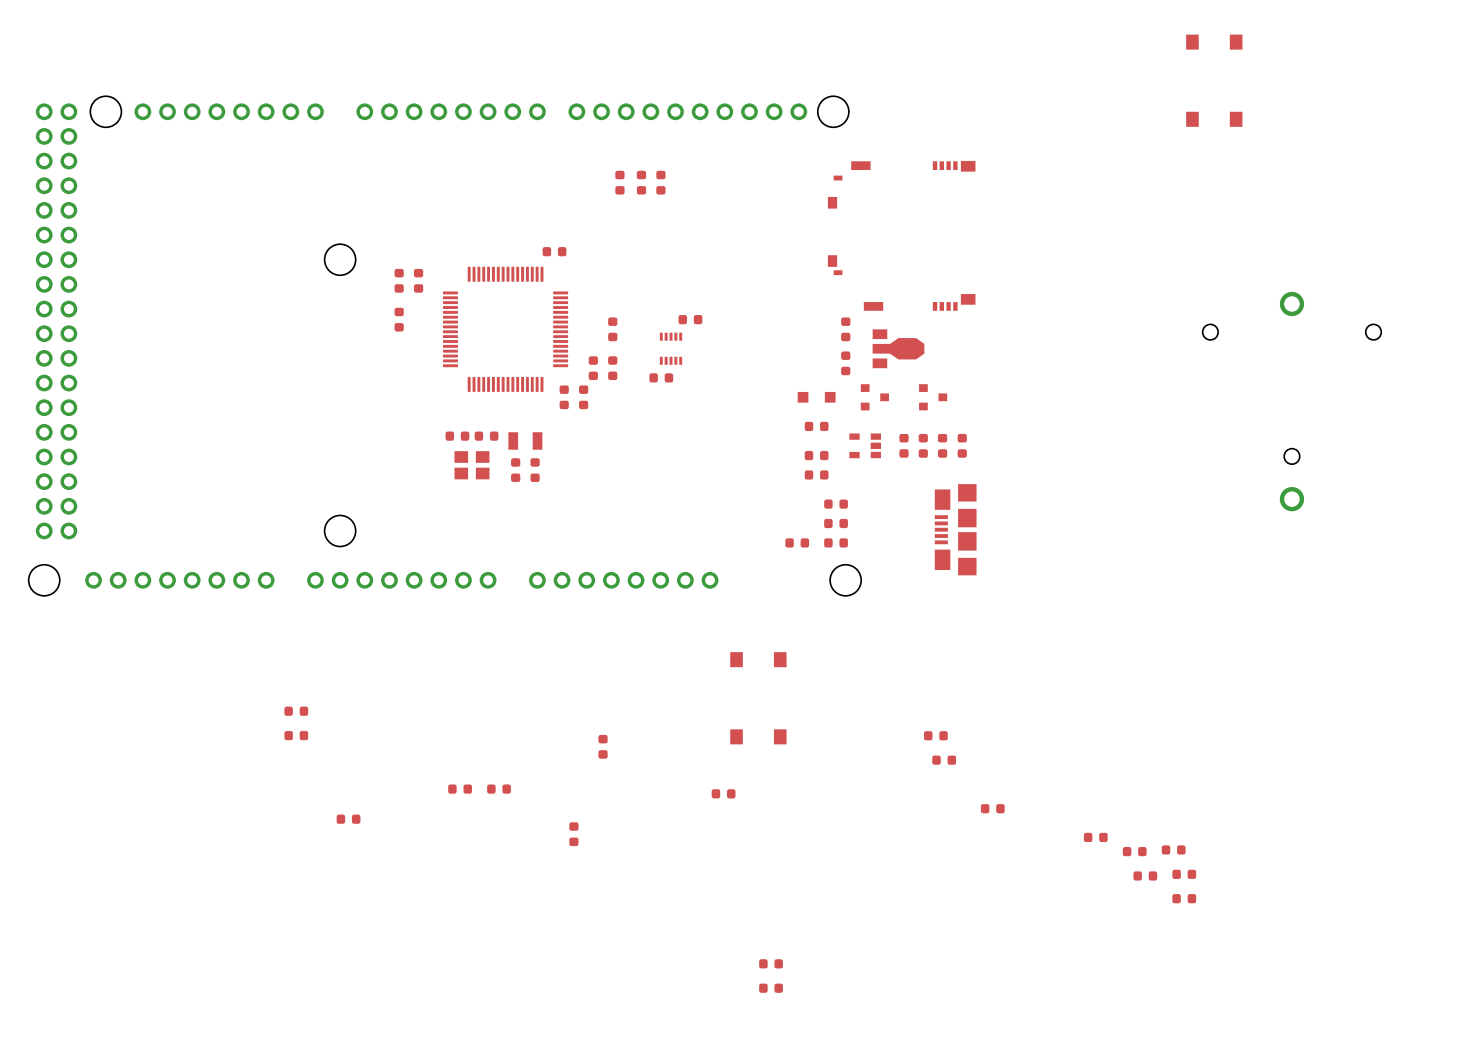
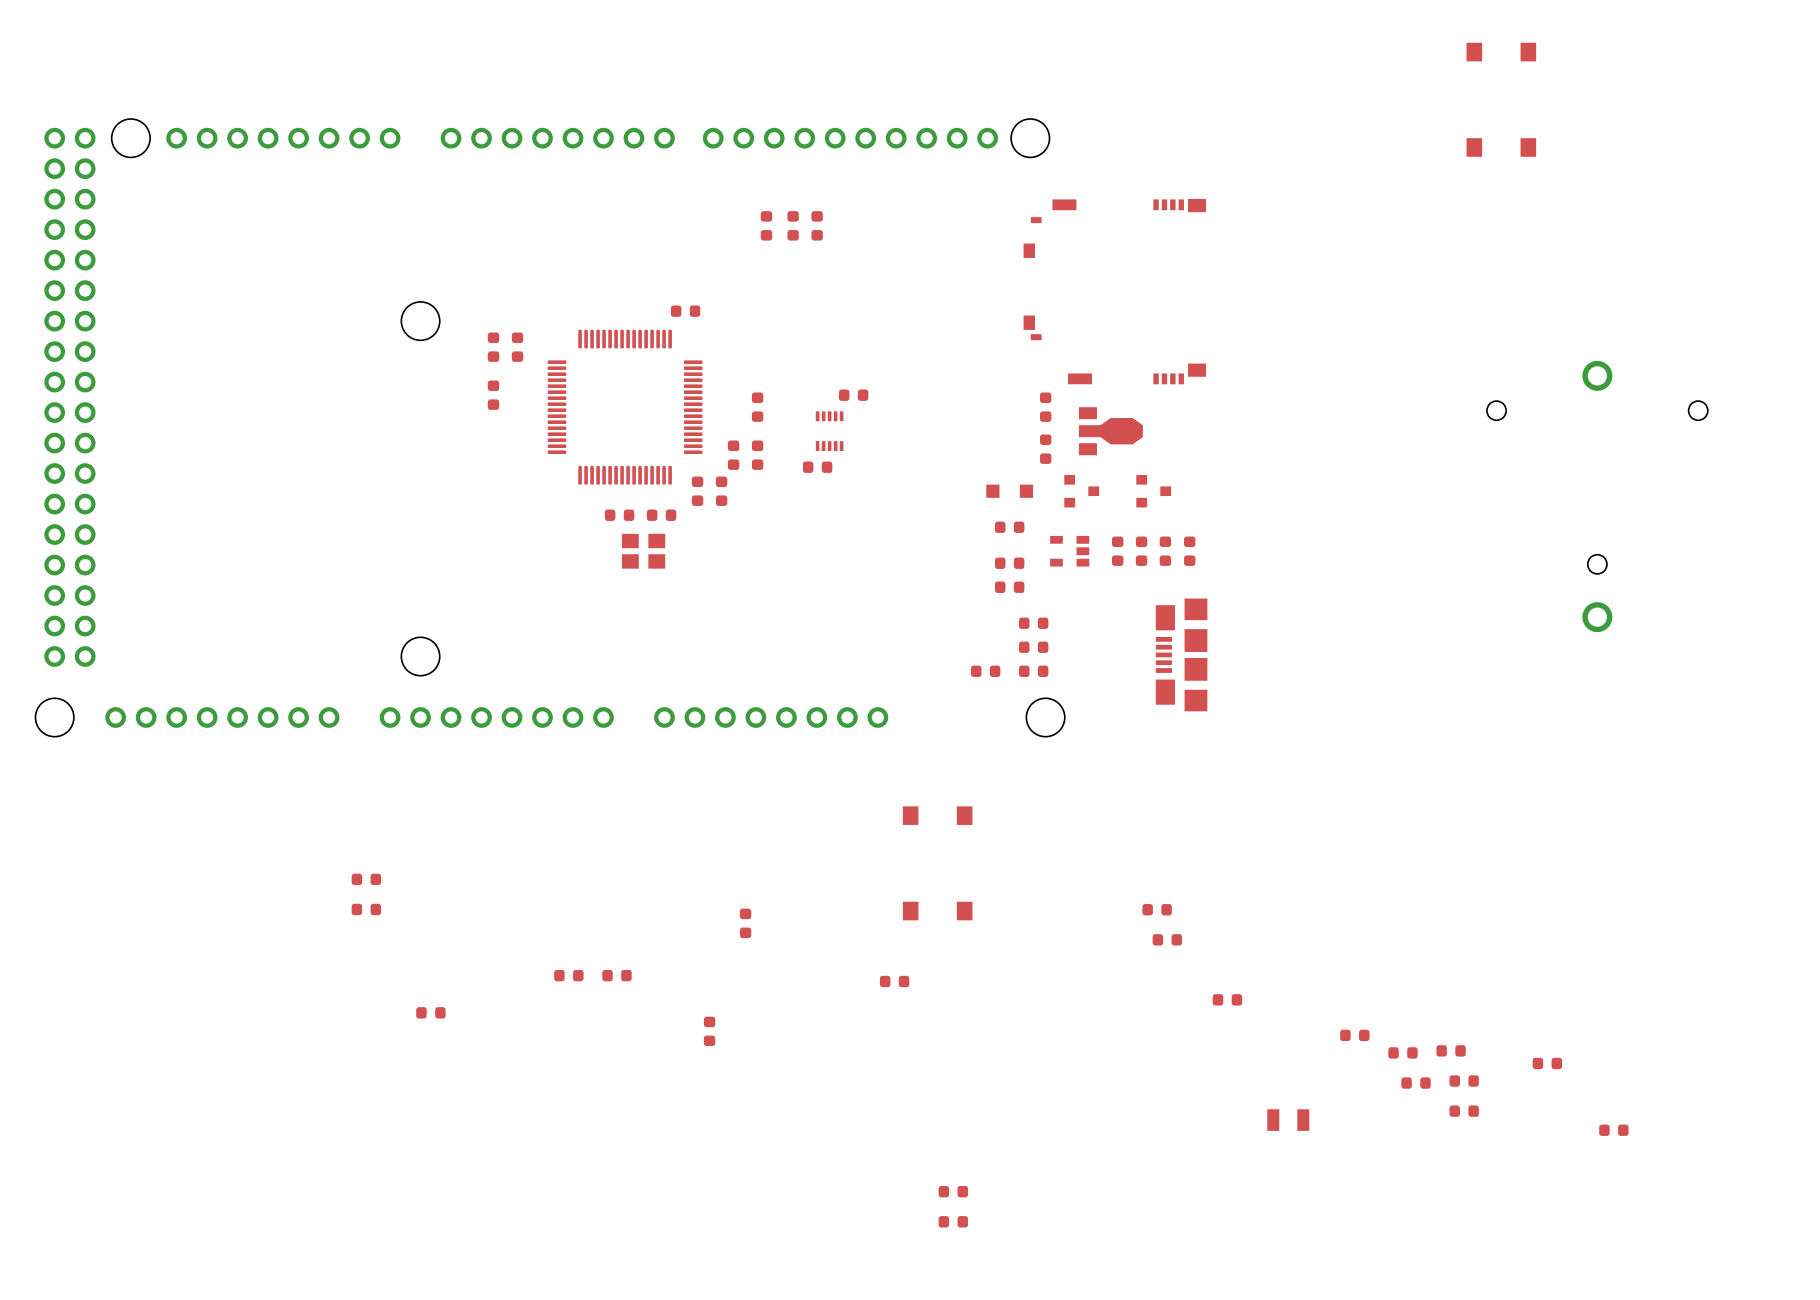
part: none -> (619, 515)
part: none -> (661, 515)
part footprint: [508, 432, 543, 450] -> [621, 533, 666, 569]
part: (457, 436) -> none
part: (486, 436) -> none
part: (471, 465) -> none
part: (515, 470) -> none
part: (535, 470) -> none
part: none -> (1547, 1063)
part: none -> (1288, 1120)
part: none -> (1613, 1130)

